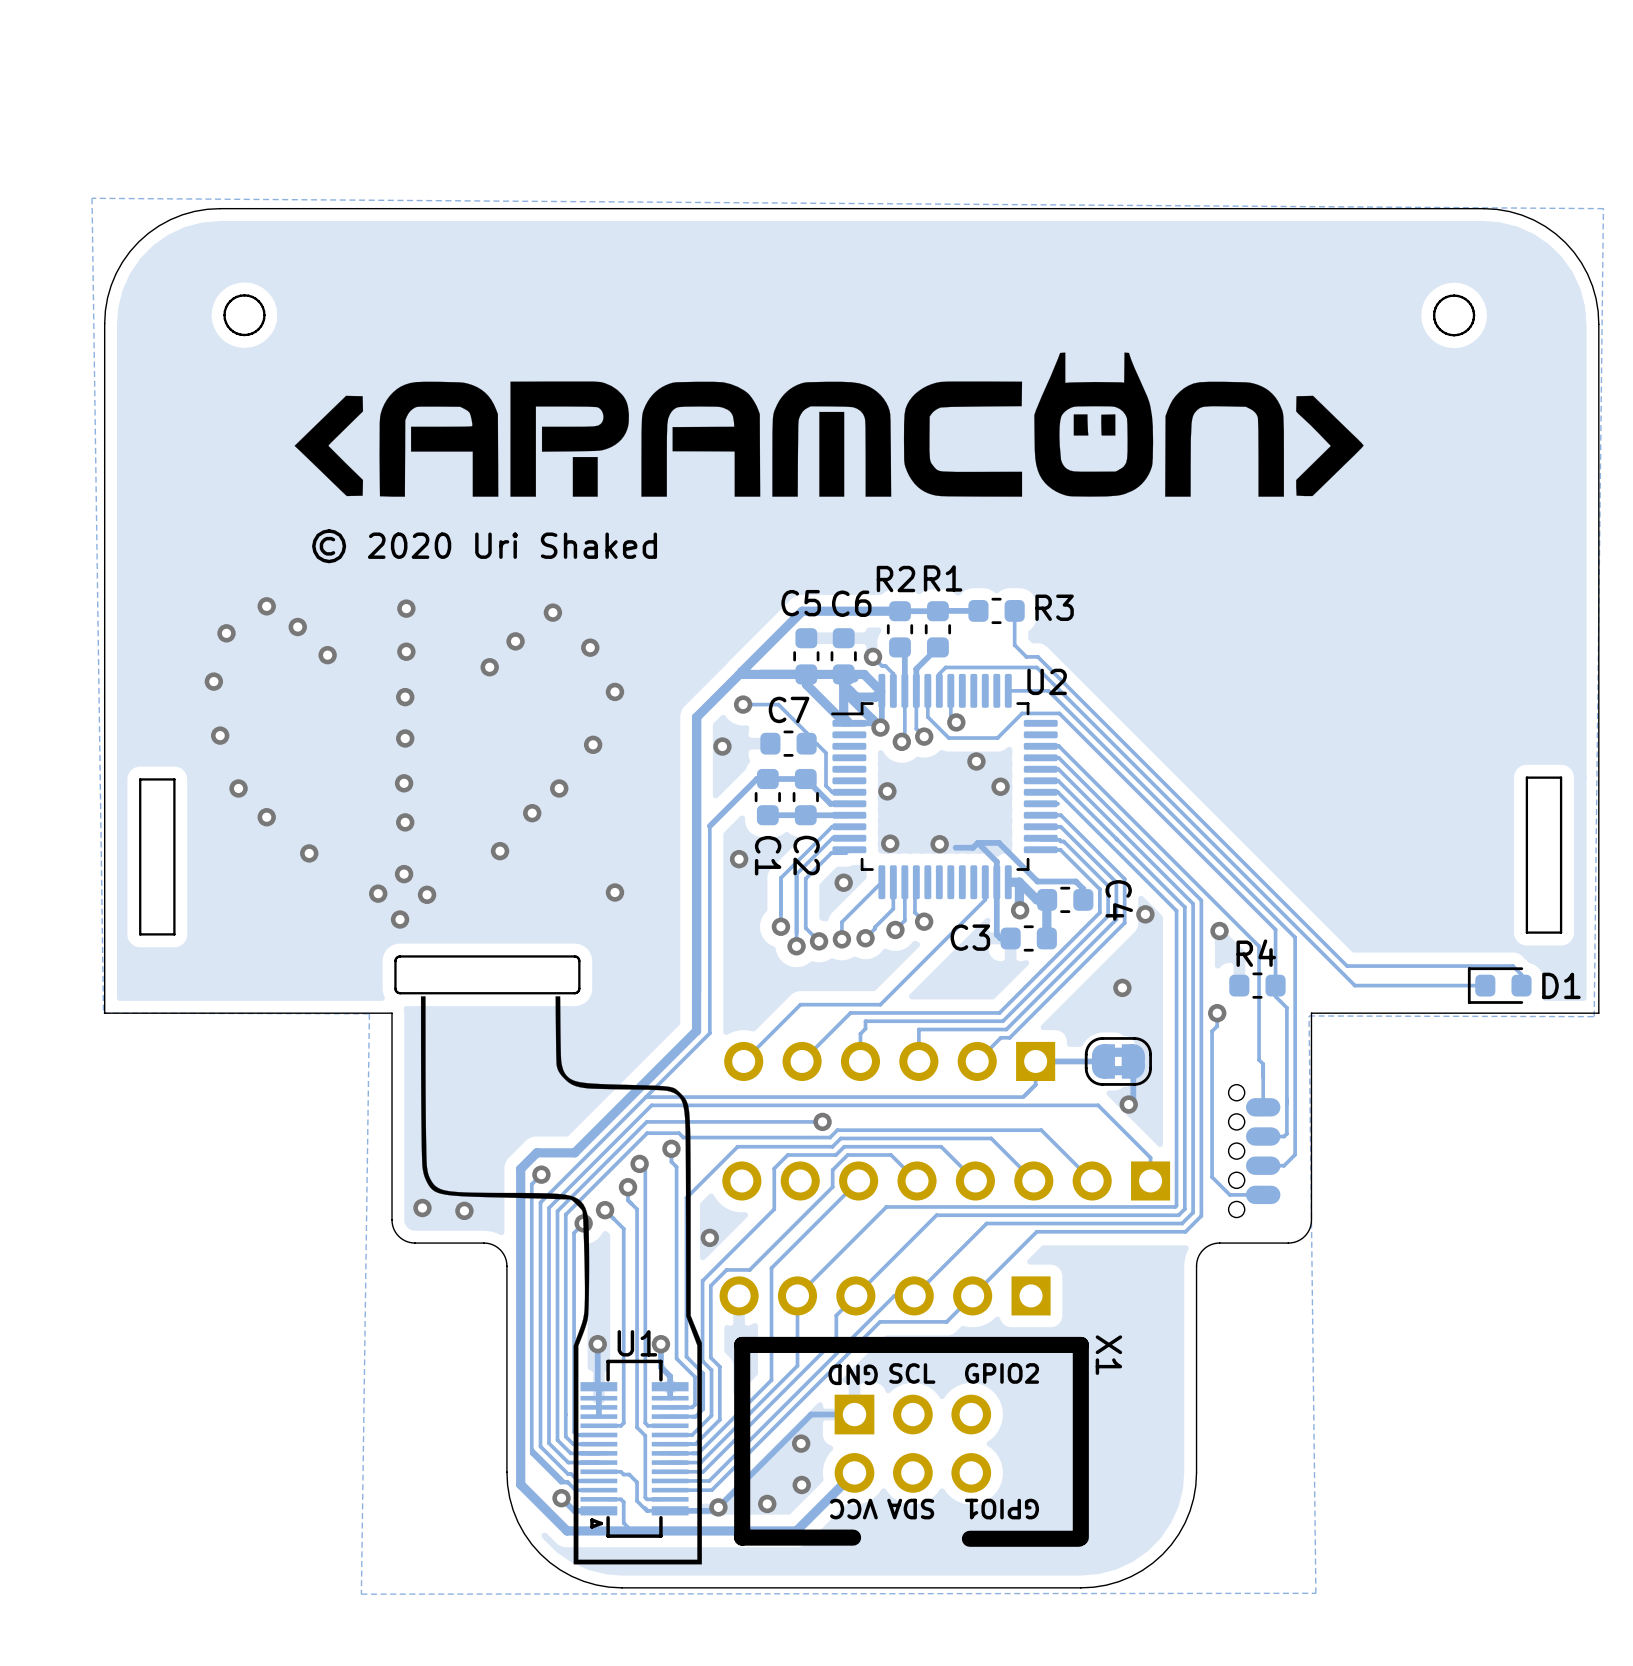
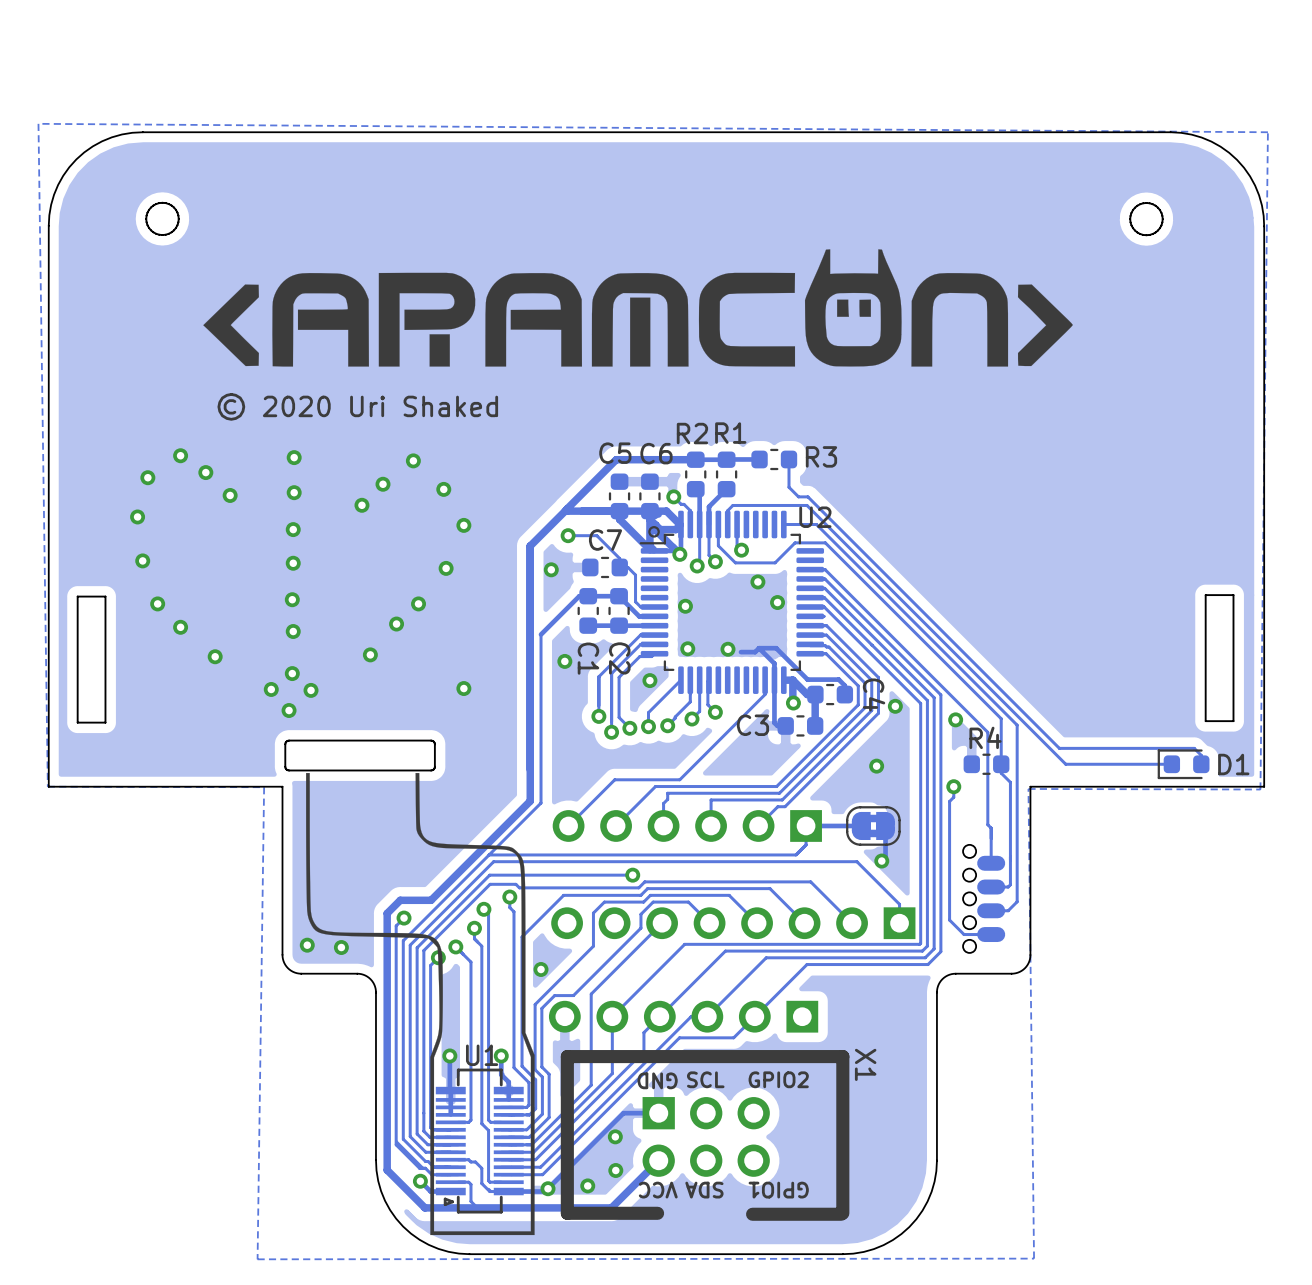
drawing: none -> [648, 526, 660, 538]

